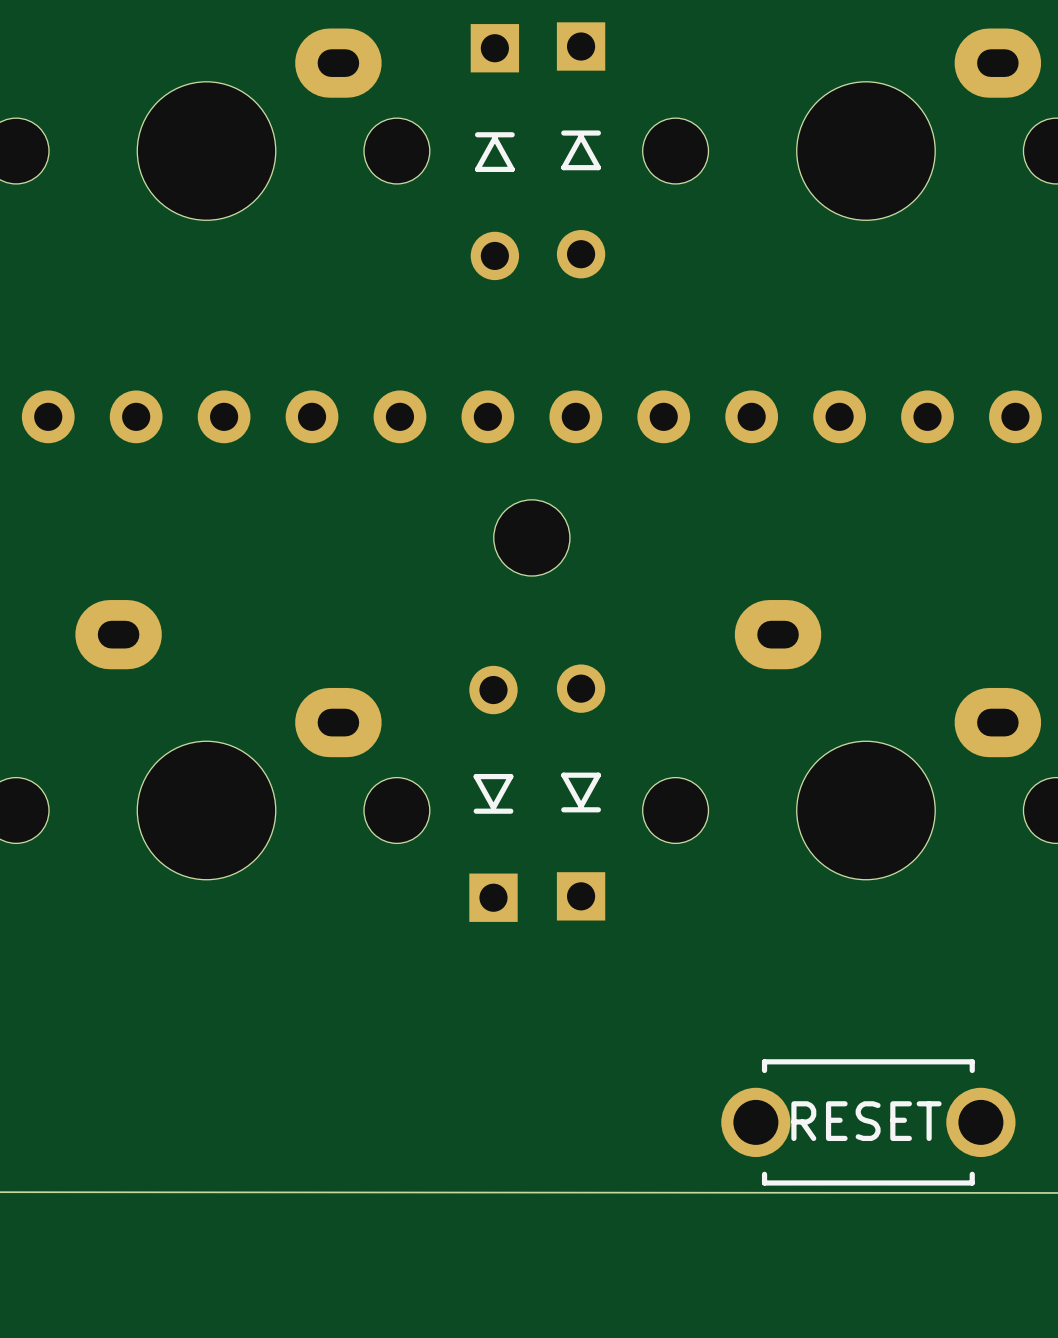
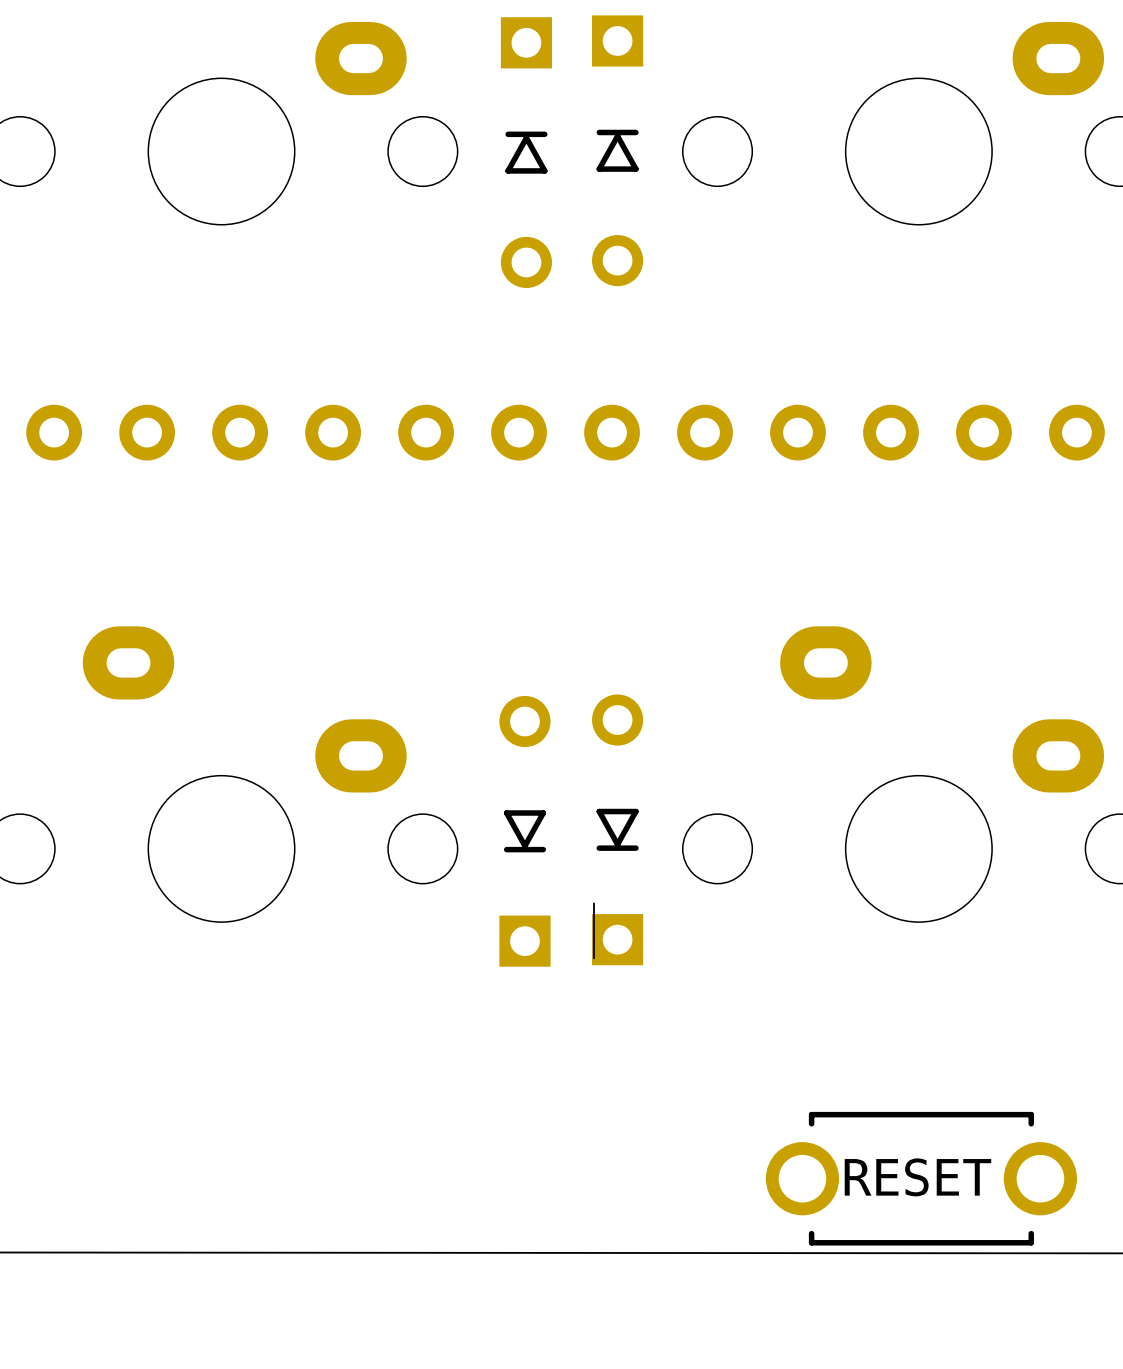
part: (531, 537) -> none
board edge: none -> (593, 903) (593, 958)

